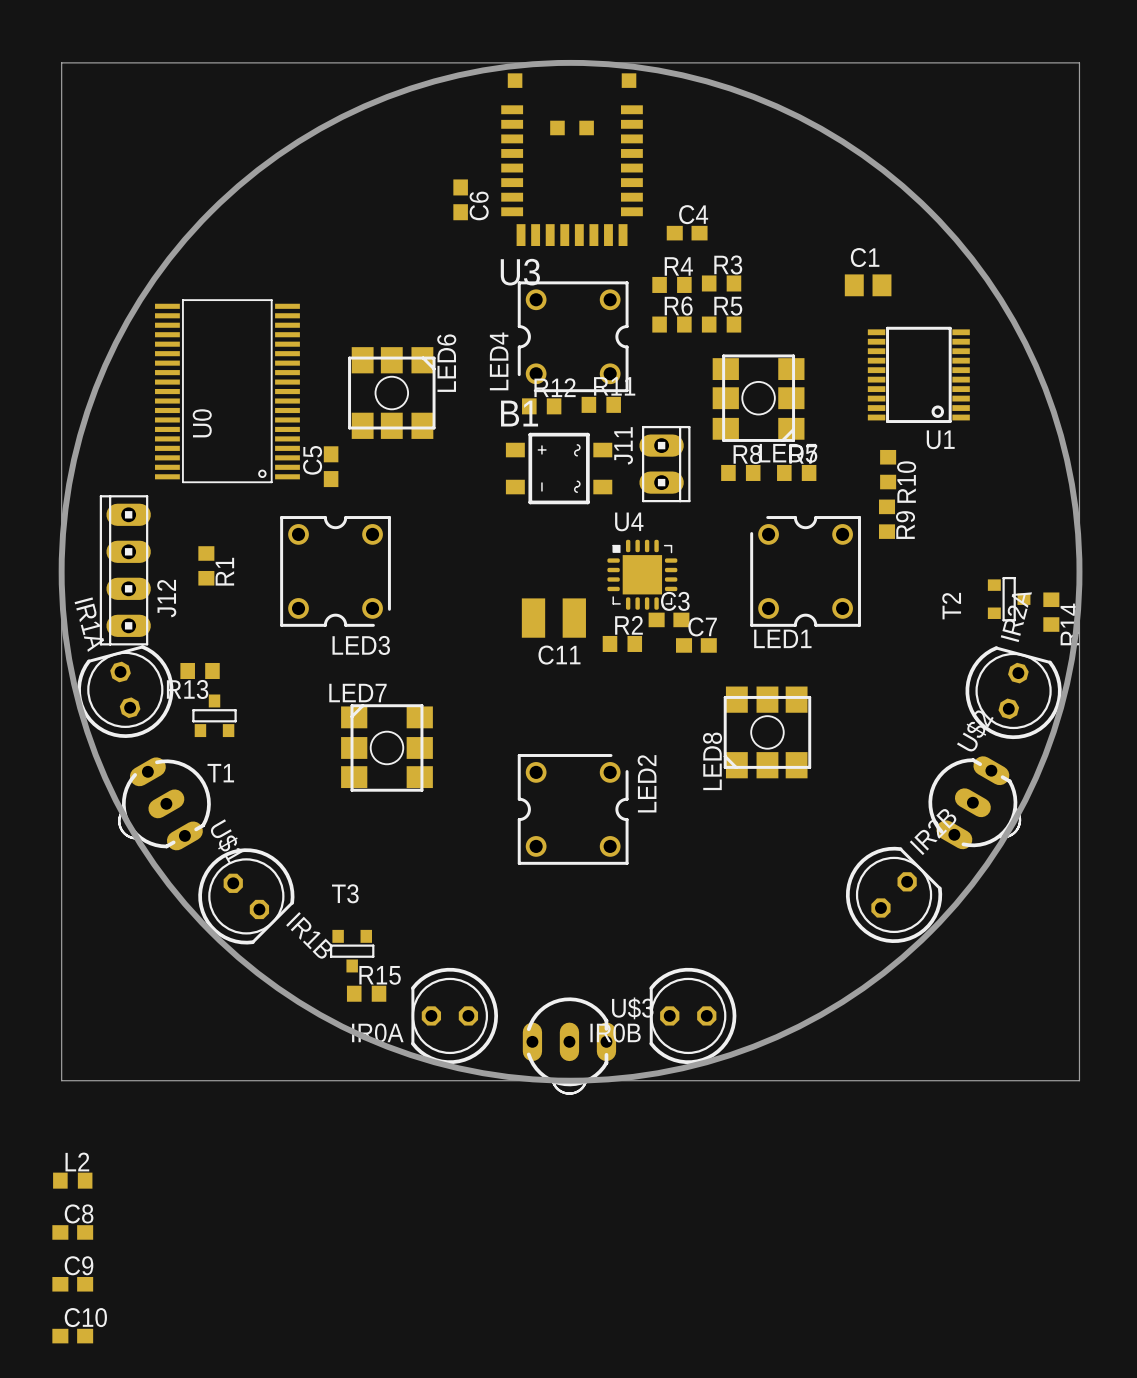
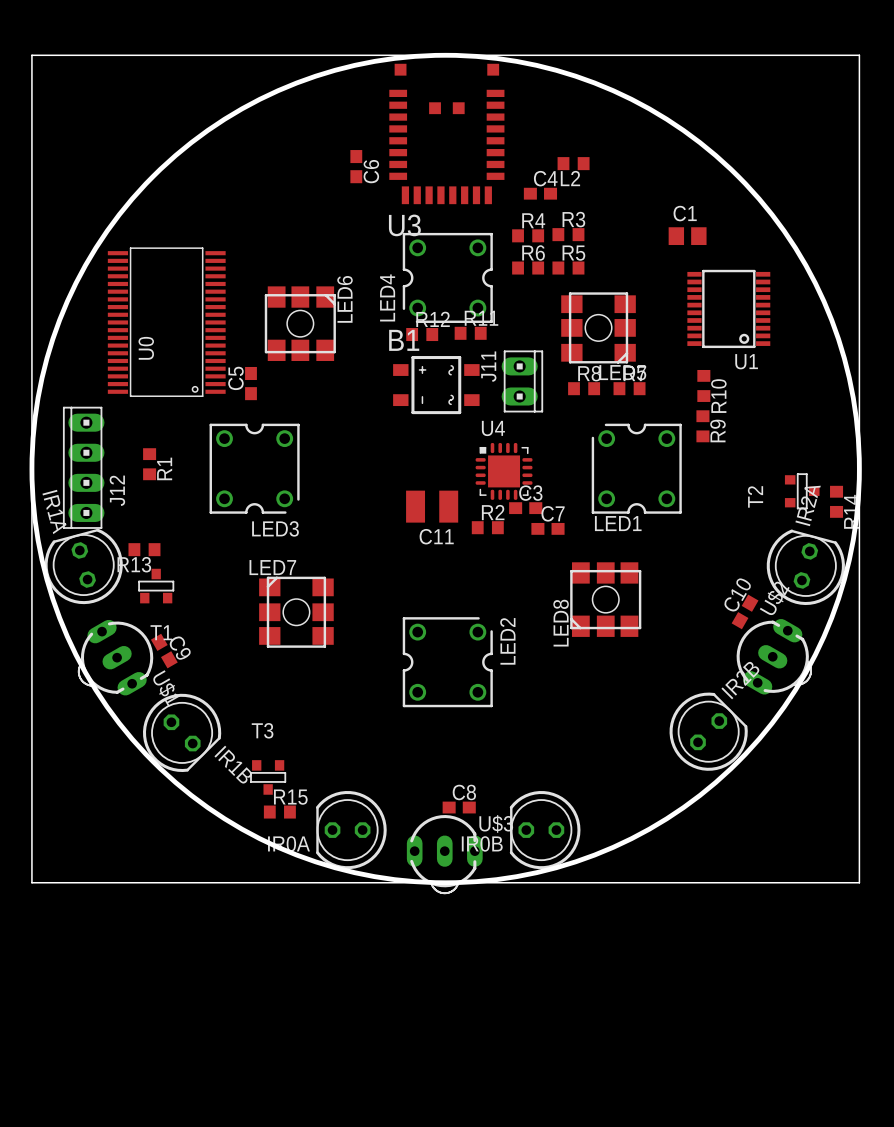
L2 name position: L2 (77, 1161) -> L2 (570, 178)
L2 position: (72, 1180) -> (573, 163)
C8 position: (72, 1232) -> (459, 807)
C9 rotation: 0° (72, 1284) -> 60° clockwise (164, 651)
C9 position: (72, 1284) -> (164, 651)
C10 rotation: 0° (72, 1336) -> 60° counterclockwise (745, 611)
C10 position: (72, 1336) -> (745, 611)

